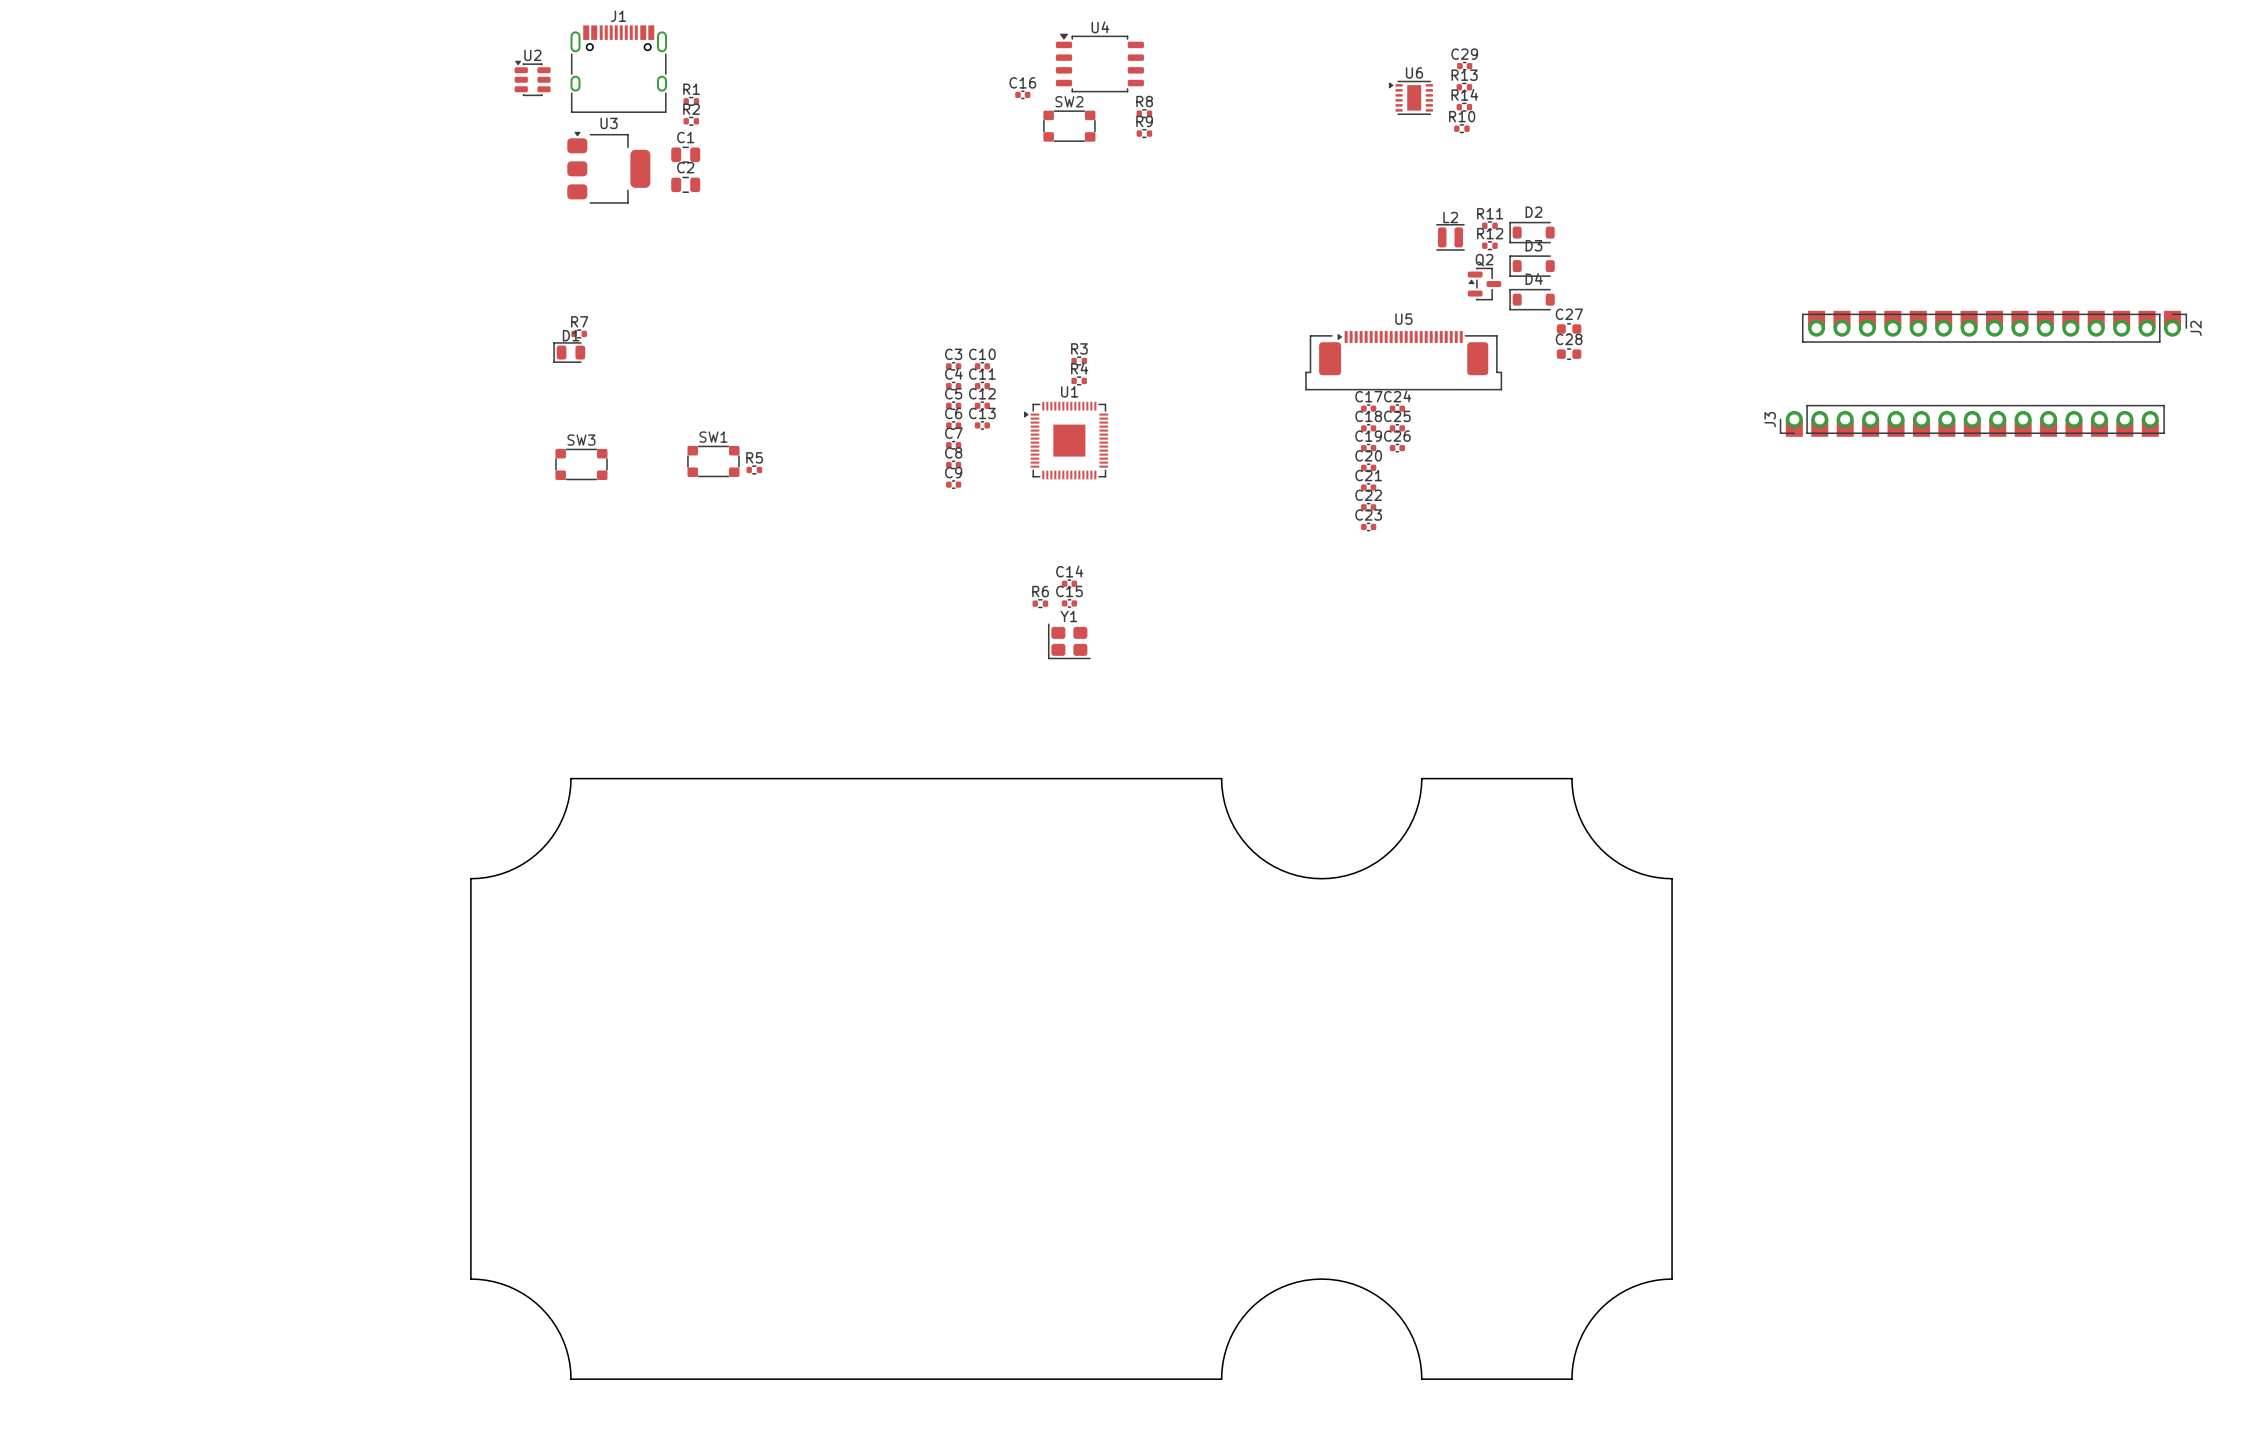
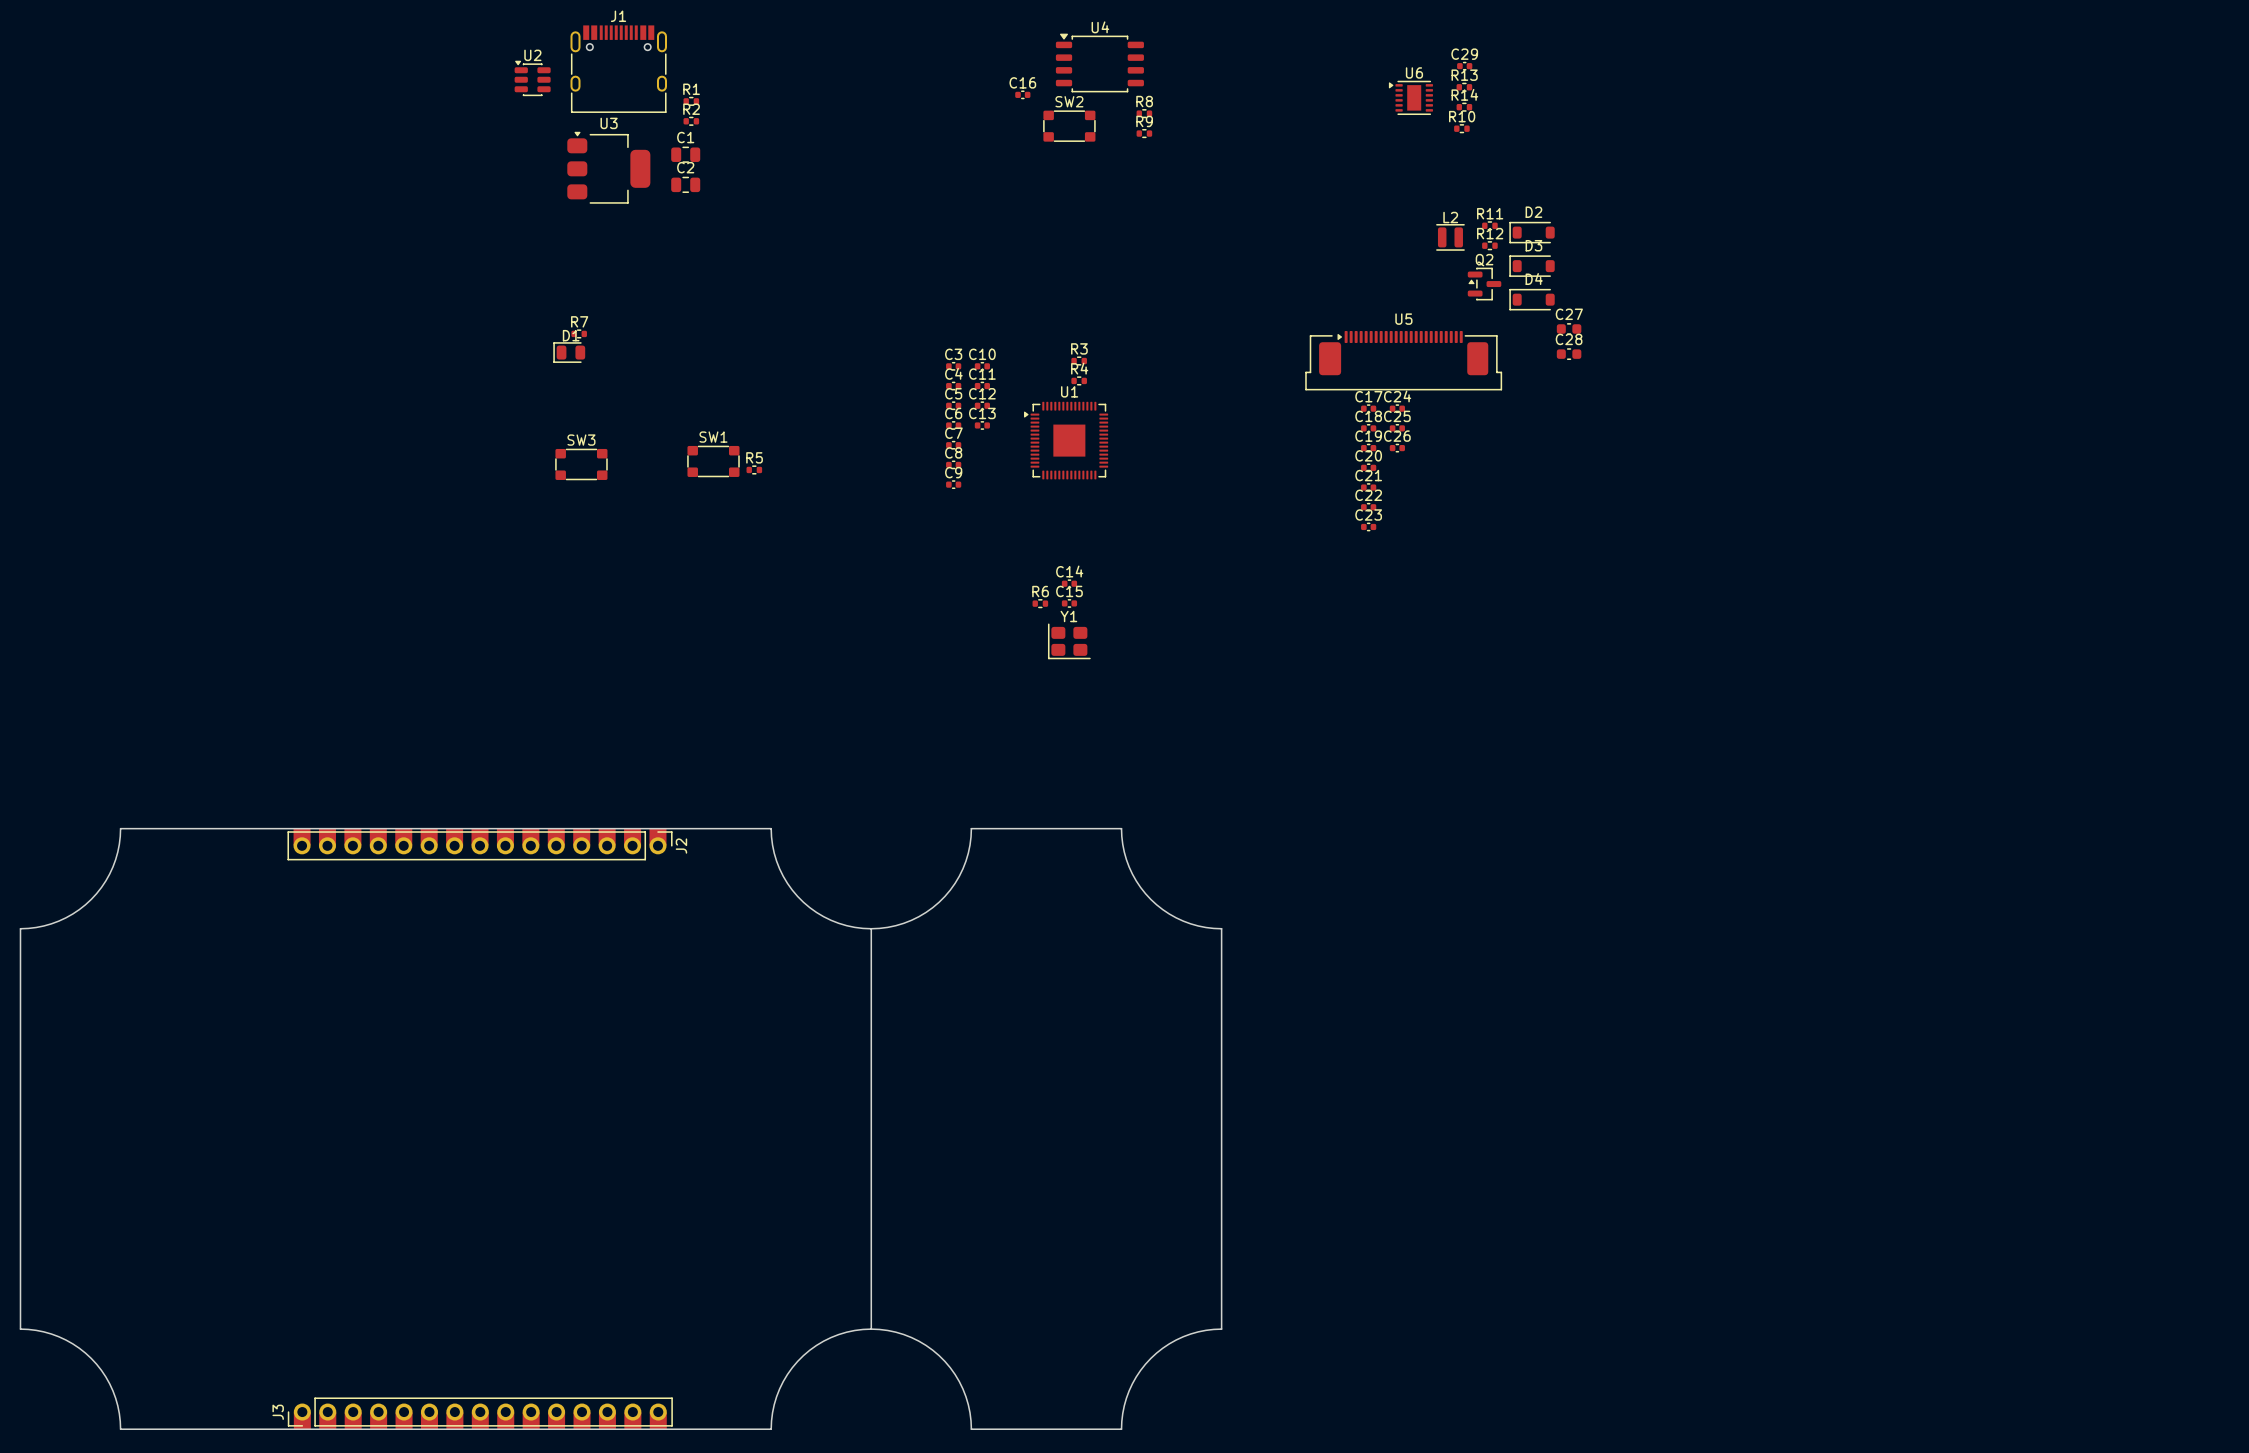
J2 position: (1994, 326) -> (480, 844)
J3 position: (1972, 420) -> (480, 1413)
board edge: (571, 778) (1221, 778) (1227, 811) (1233, 826) (1248, 846) (1266, 862) (1281, 870) (1297, 875) (1321, 878) (1346, 875) (1361, 870) (1376, 862) (1395, 846) (1409, 826) (1416, 811) (1421, 778) (1571, 778) (1574, 801) (1579, 816) (1591, 837) (1601, 849) (1613, 859) (1633, 871) (1656, 877) (1672, 878) (1672, 1279) (1656, 1280) (1633, 1286) (1613, 1298) (1601, 1308) (1591, 1320) (1579, 1340) (1573, 1363) (1571, 1379) (1421, 1379) (1416, 1346) (1409, 1331) (1395, 1311) (1376, 1295) (1361, 1287) (1346, 1282) (1321, 1279) (1289, 1284) (1274, 1291) (1253, 1305) (1237, 1324) (1230, 1338) (1224, 1354) (1221, 1379) (571, 1379) (569, 1363) (563, 1340) (551, 1320) (541, 1308) (523, 1293) (509, 1286) (486, 1280) (470, 1279) (470, 878) (494, 875) (509, 871) (523, 863) (541, 849) (551, 837) (563, 816) (569, 794) (571, 778) -> none
board edge: none -> (120, 828) (771, 828) (776, 861) (787, 883) (797, 896) (809, 907) (831, 920) (854, 927) (871, 928) (903, 923) (926, 912) (939, 902) (950, 890) (962, 868) (970, 845) (971, 828) (1121, 828) (1124, 852) (1129, 866) (1136, 880) (1150, 899) (1169, 913) (1183, 921) (1205, 927) (1221, 928) (1221, 1329) (1198, 1331) (1183, 1336) (1162, 1348) (1150, 1358) (1140, 1370) (1129, 1390) (1122, 1413) (1121, 1429) (971, 1429) (968, 1404) (962, 1389) (955, 1374) (939, 1355) (918, 1341) (903, 1334) (871, 1329) (838, 1334) (823, 1341) (803, 1355) (787, 1374) (779, 1389) (774, 1404) (771, 1429) (120, 1429) (119, 1413) (112, 1390) (105, 1376) (91, 1358) (72, 1343) (58, 1336) (43, 1331) (20, 1329) (20, 928) (43, 925) (58, 921) (79, 909) (91, 899) (101, 887) (112, 866) (117, 852) (120, 828)
board edge: none -> (871, 928) (871, 1329)

